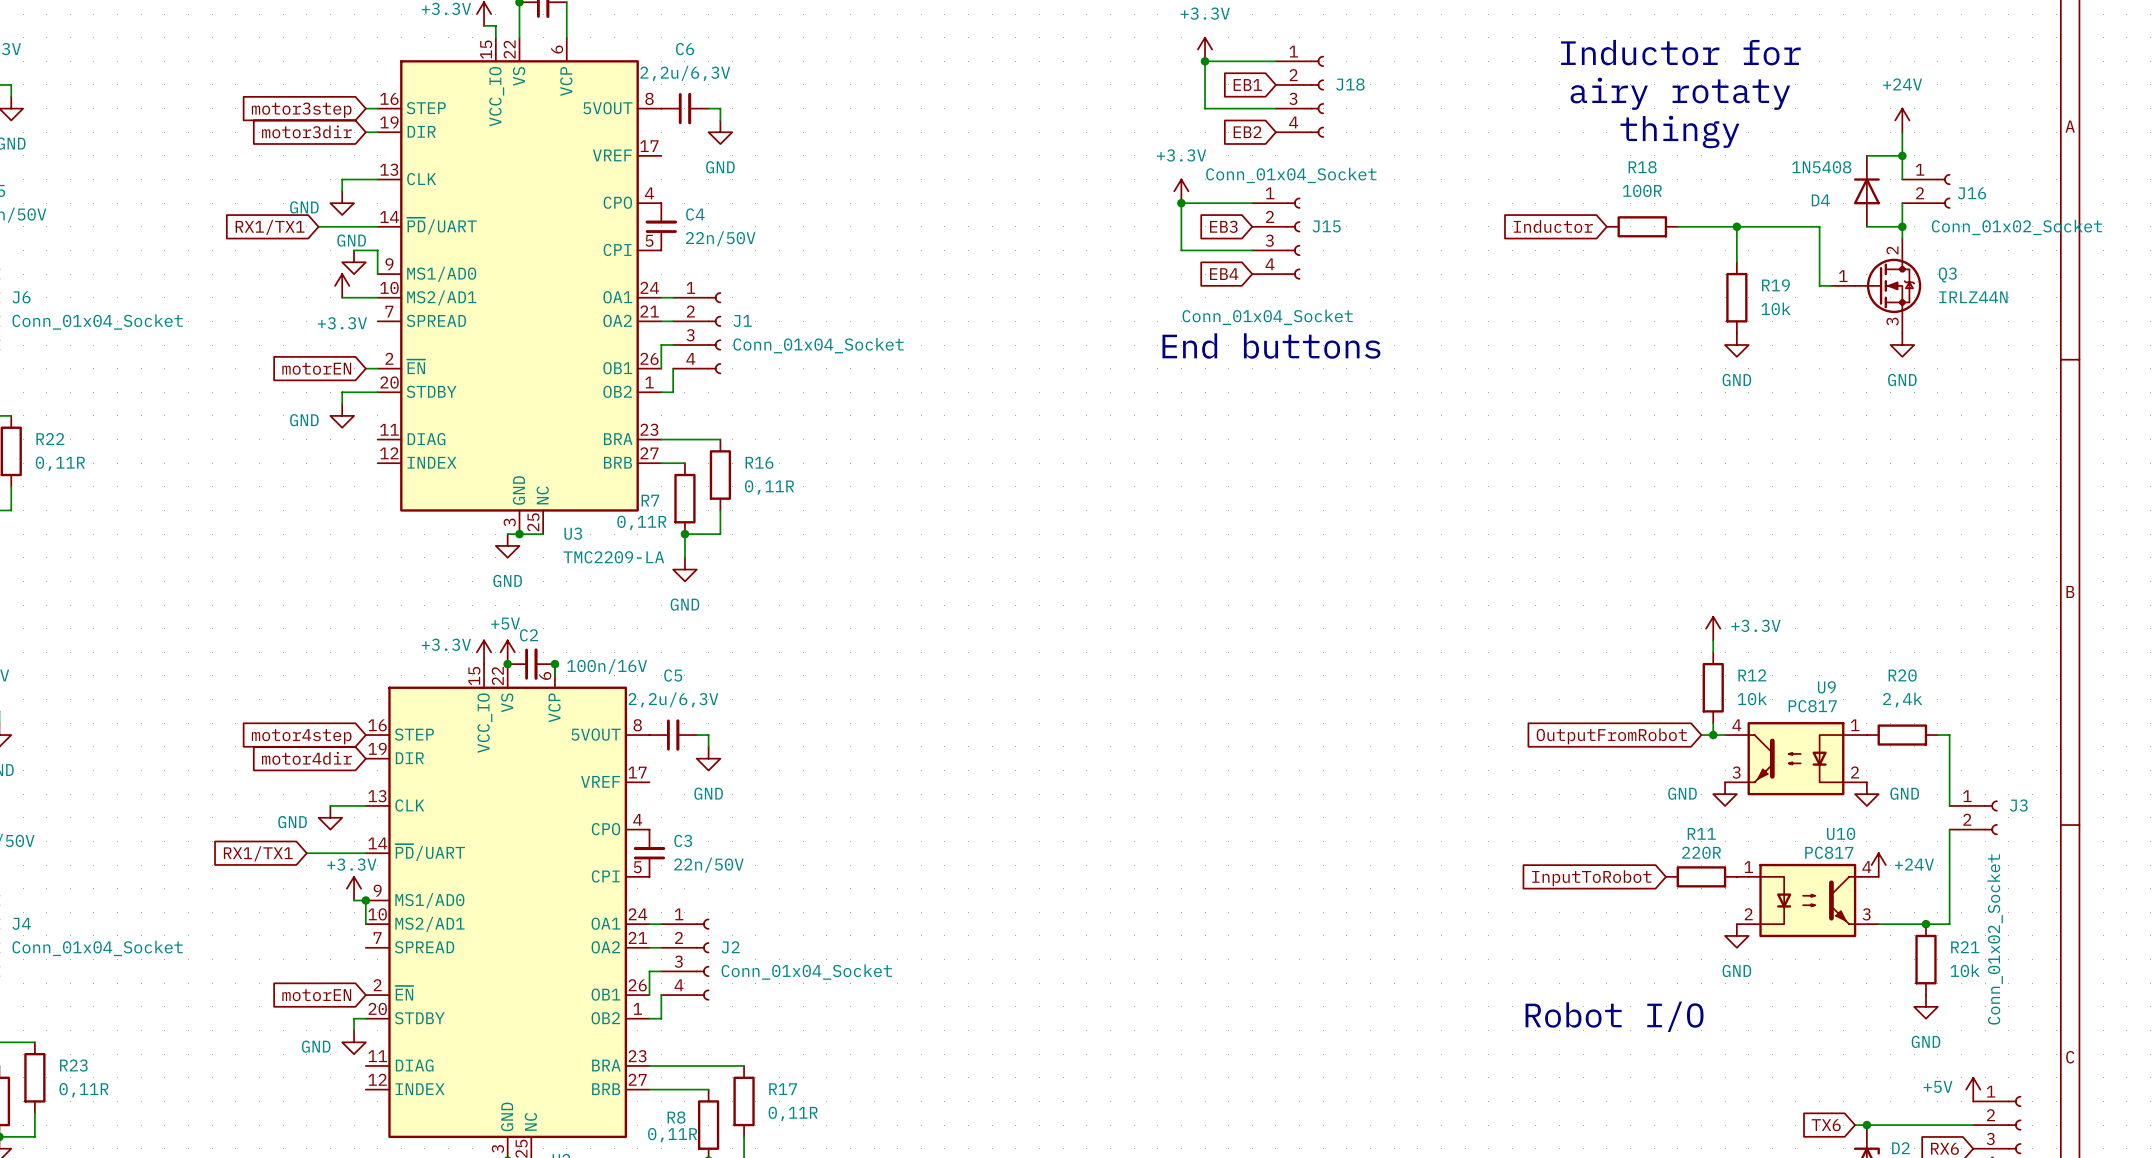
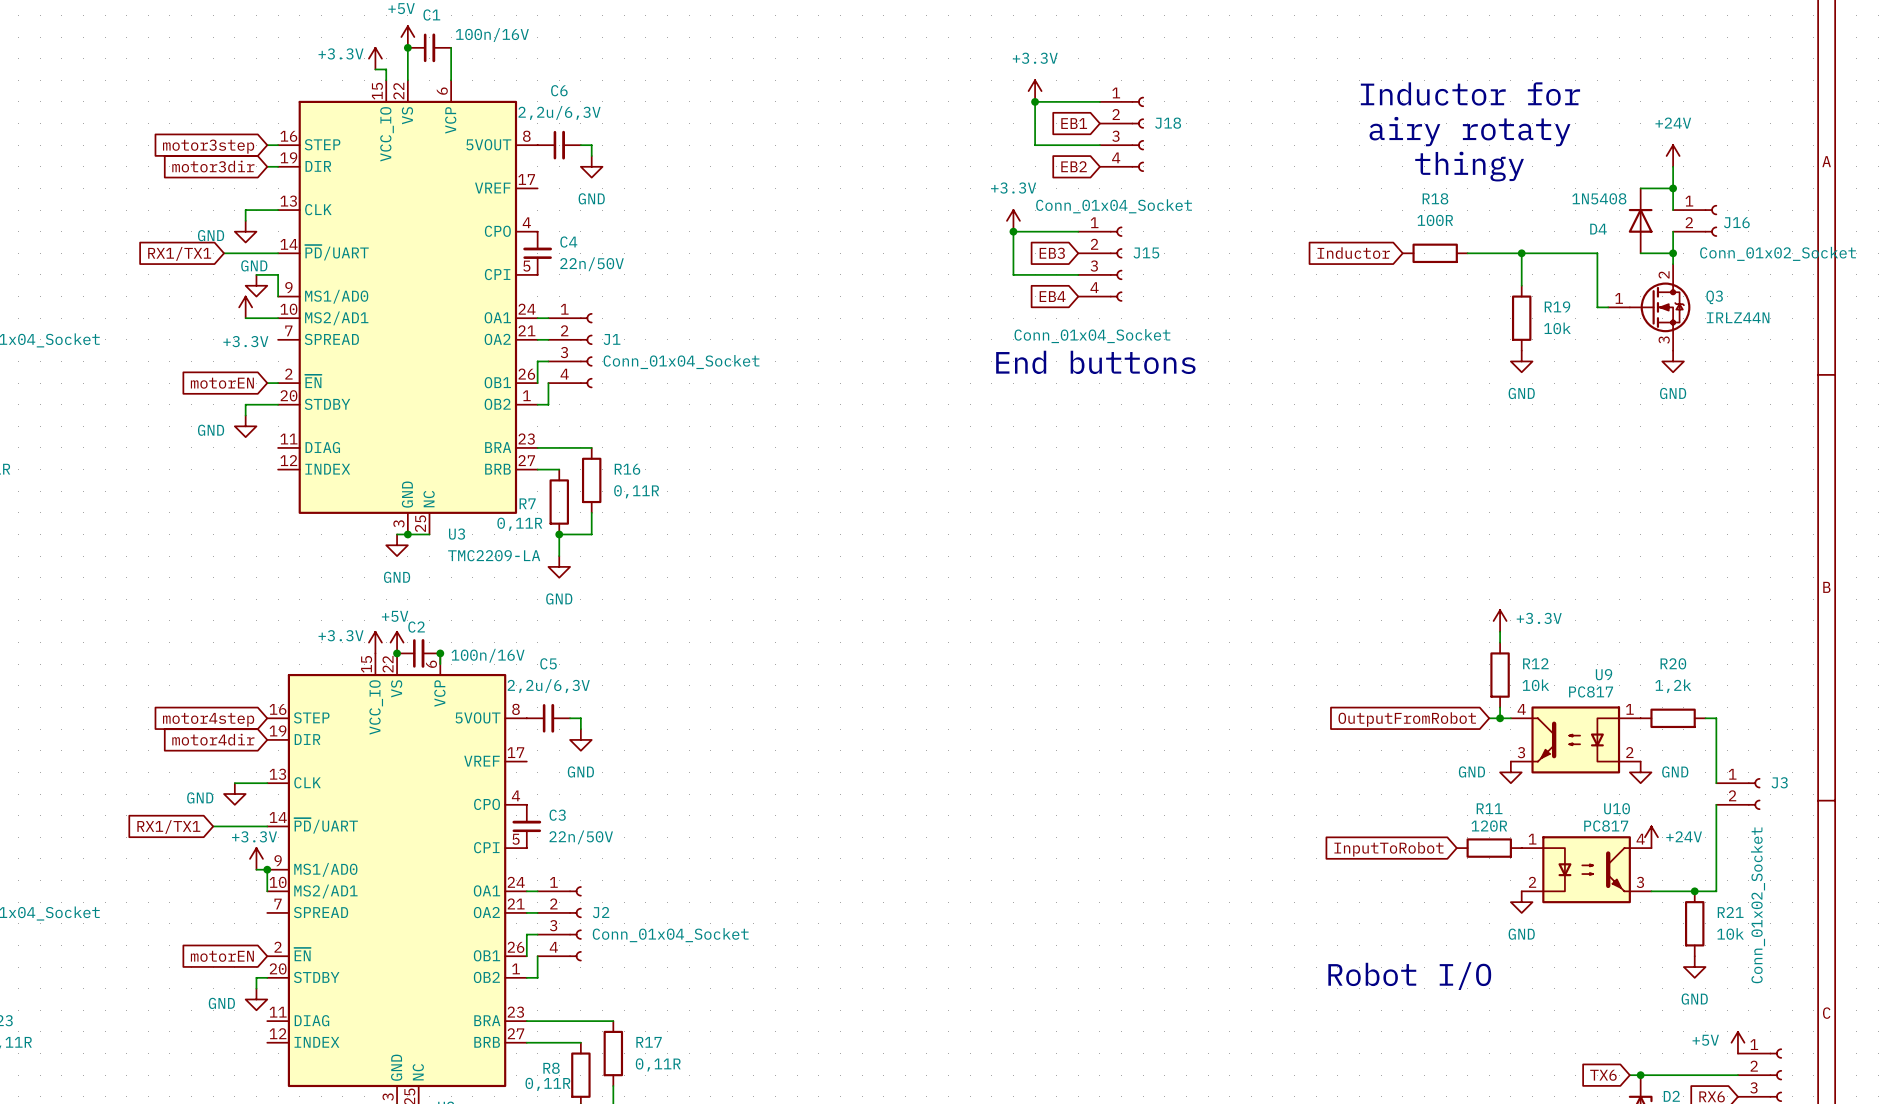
R20 value: 2,4k (1902, 699) -> 1,2k (1673, 686)
R11 value: 220R (1701, 852) -> 120R (1489, 826)

